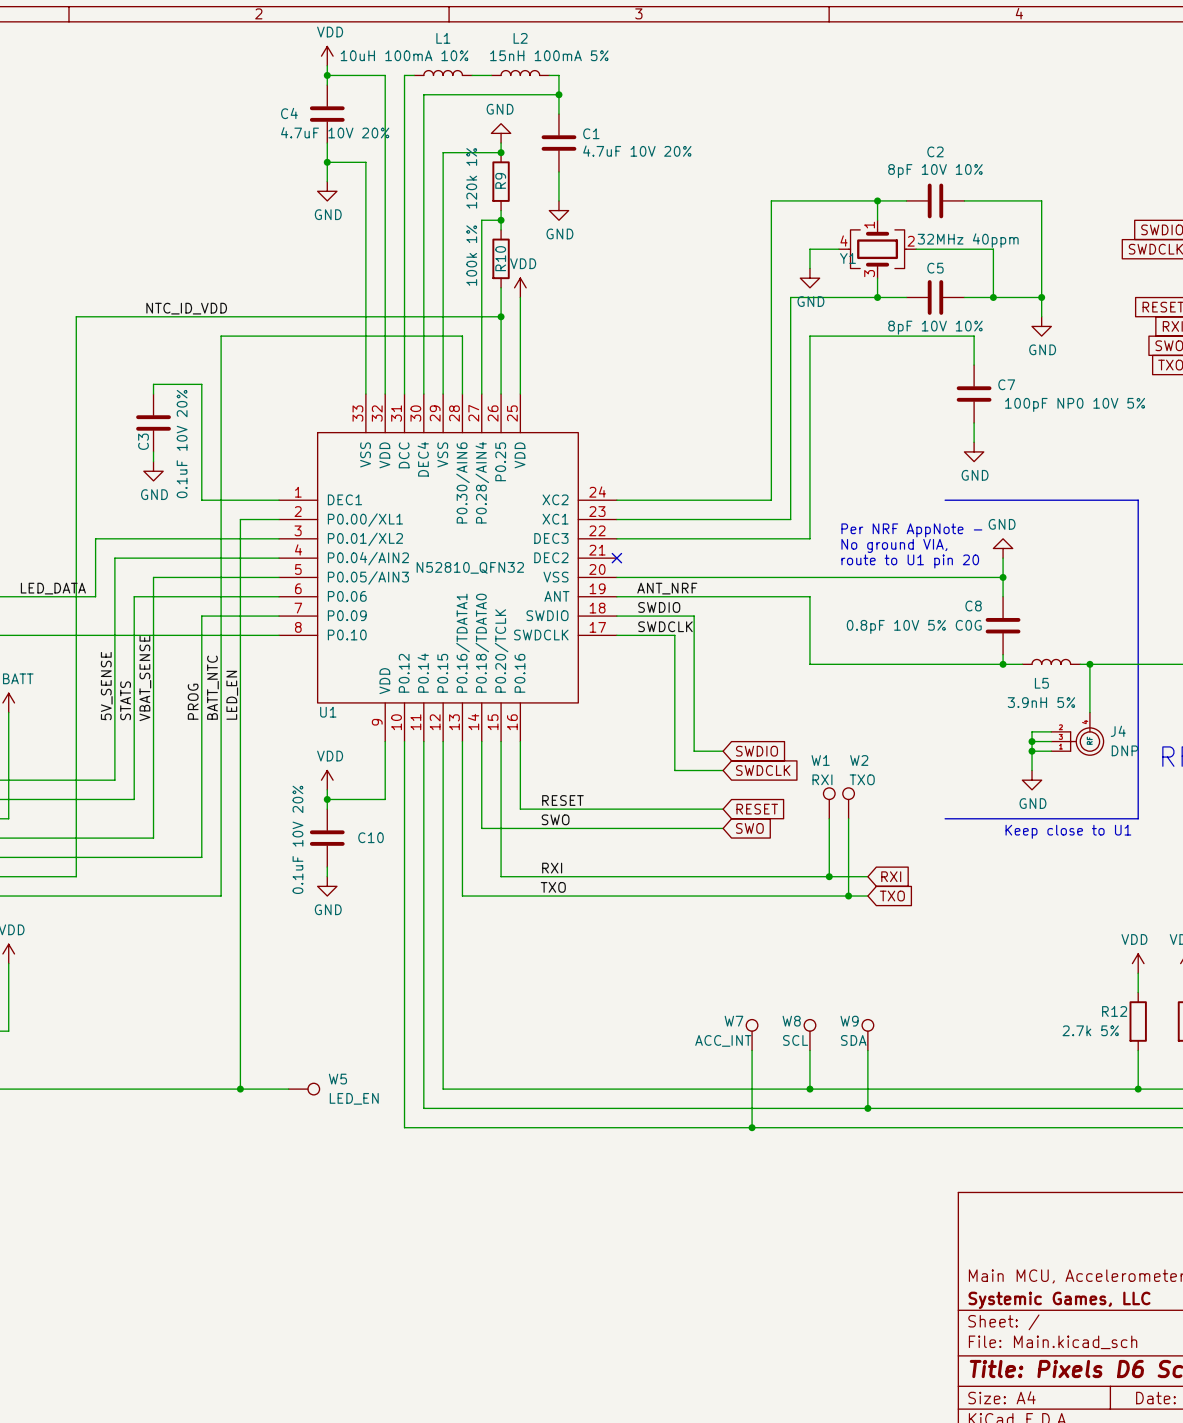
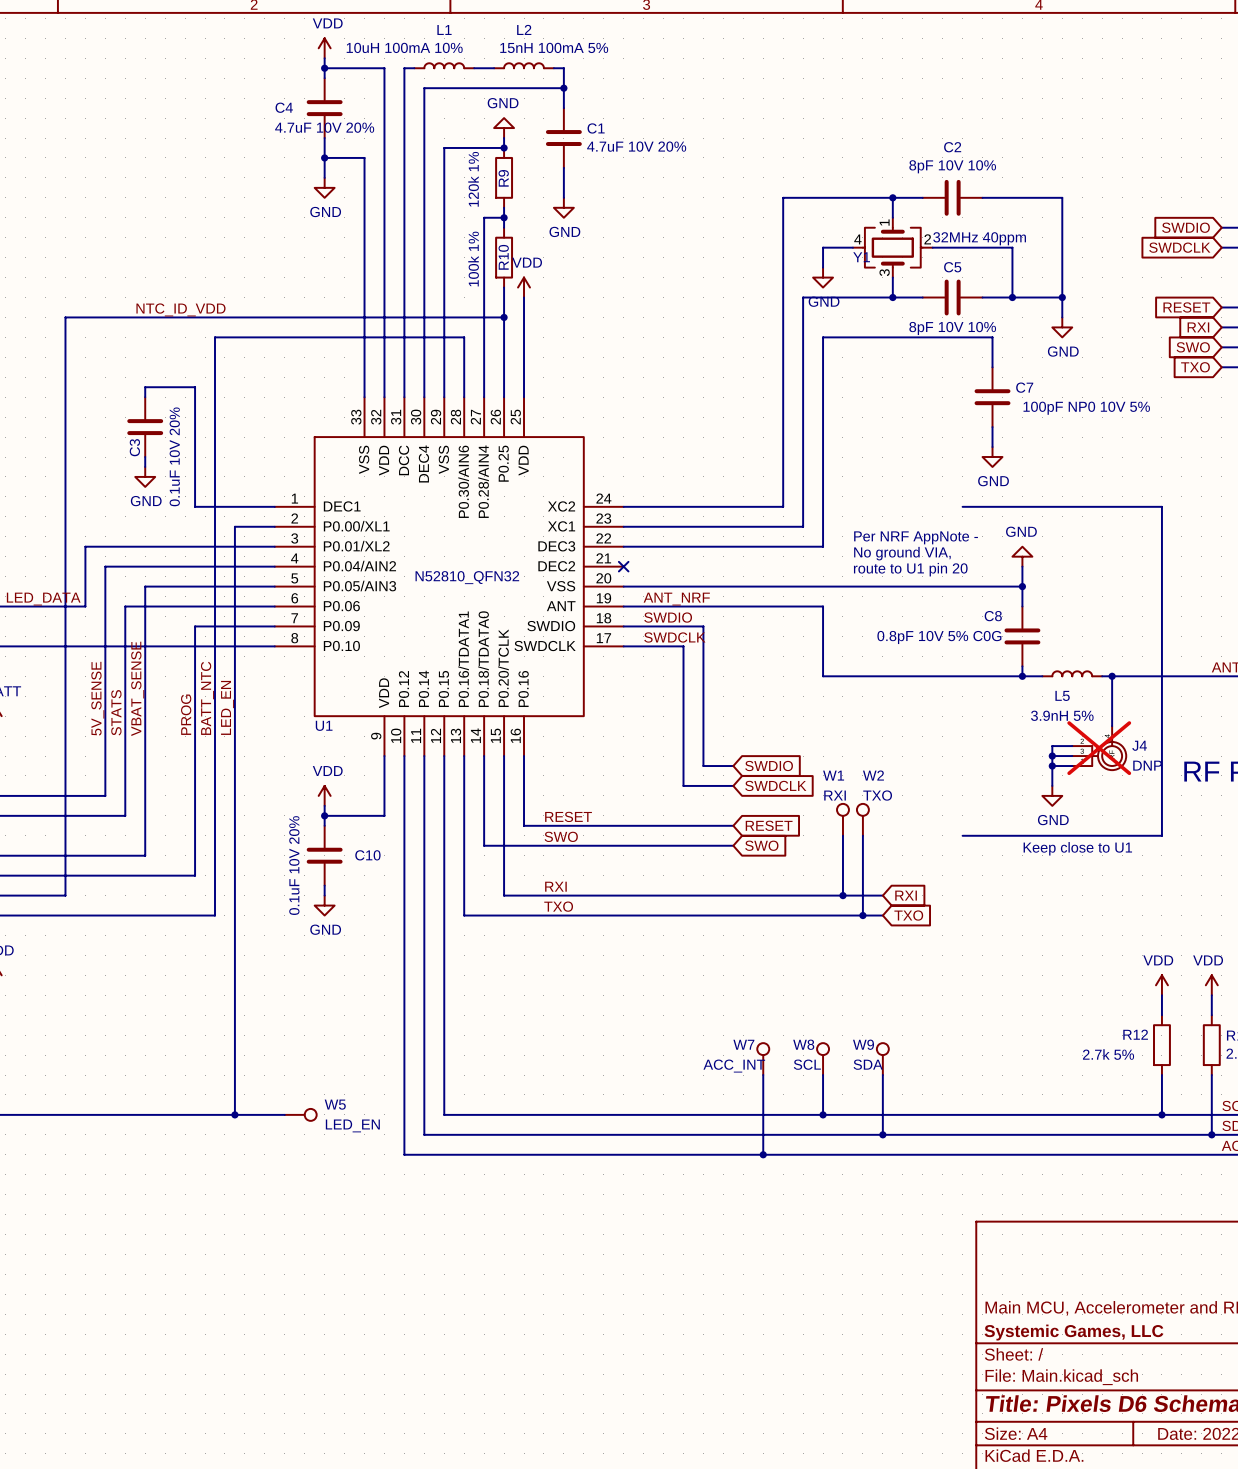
J4 do-not-place cross: none -> (1099, 748)

